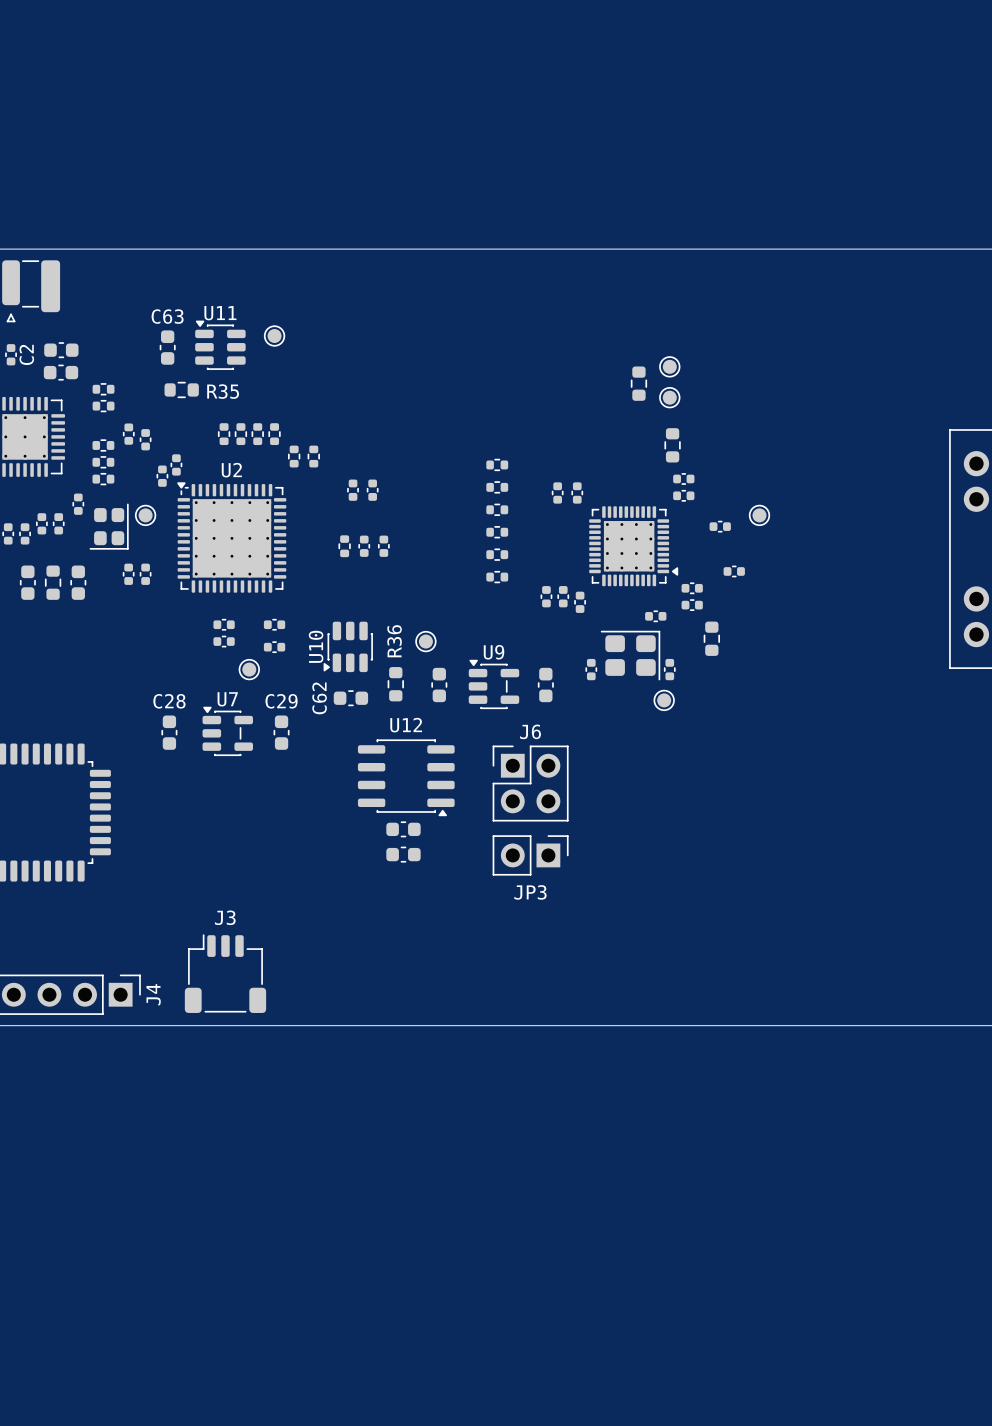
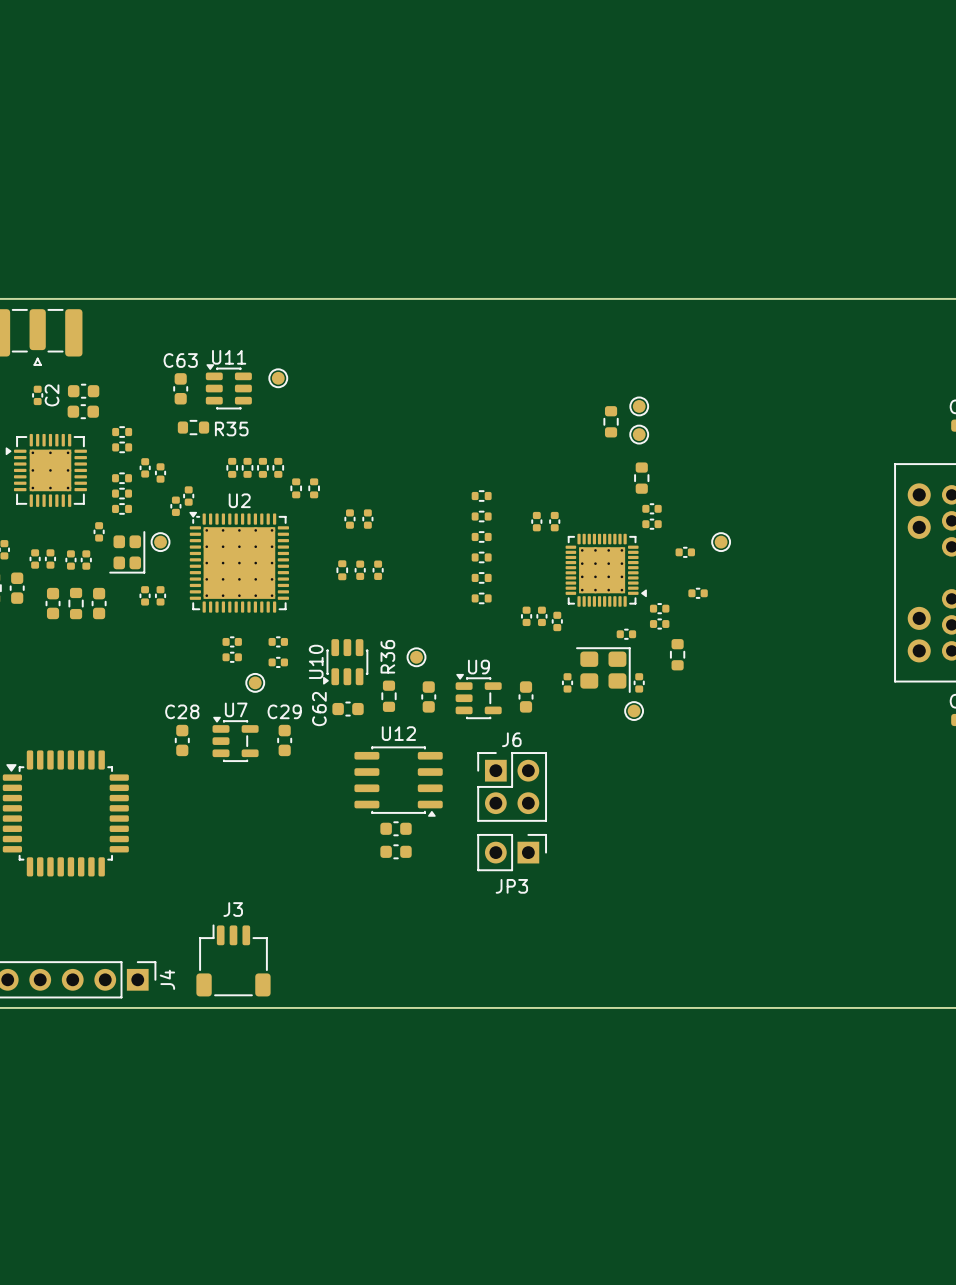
part: (103, 389) -> none
part: none -> (122, 432)
part: (103, 406) -> none
part: none -> (122, 447)
part: (41, 523) -> none
part: (58, 523) -> none
part: none -> (70, 560)
part: none -> (86, 560)

